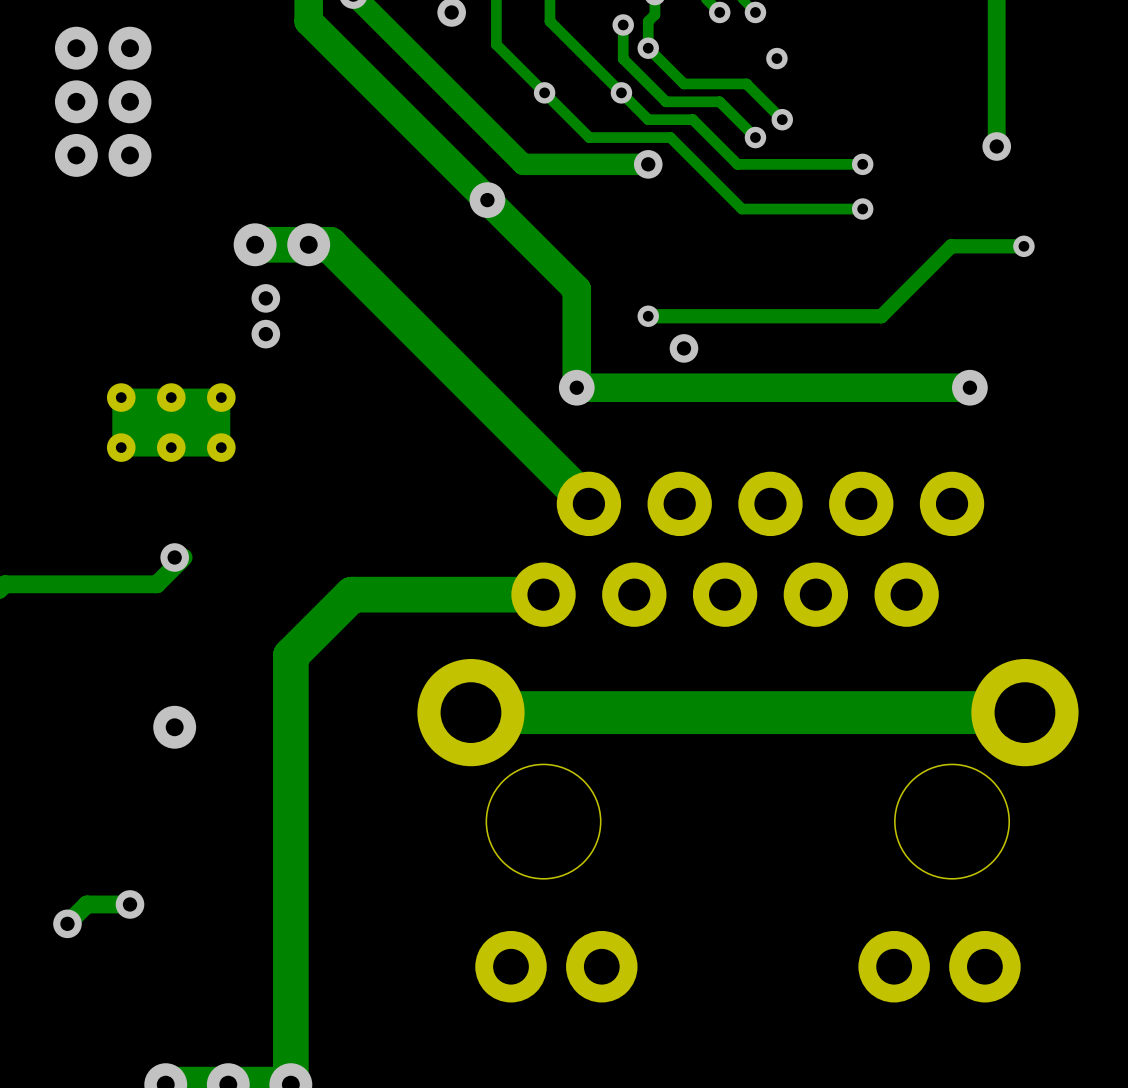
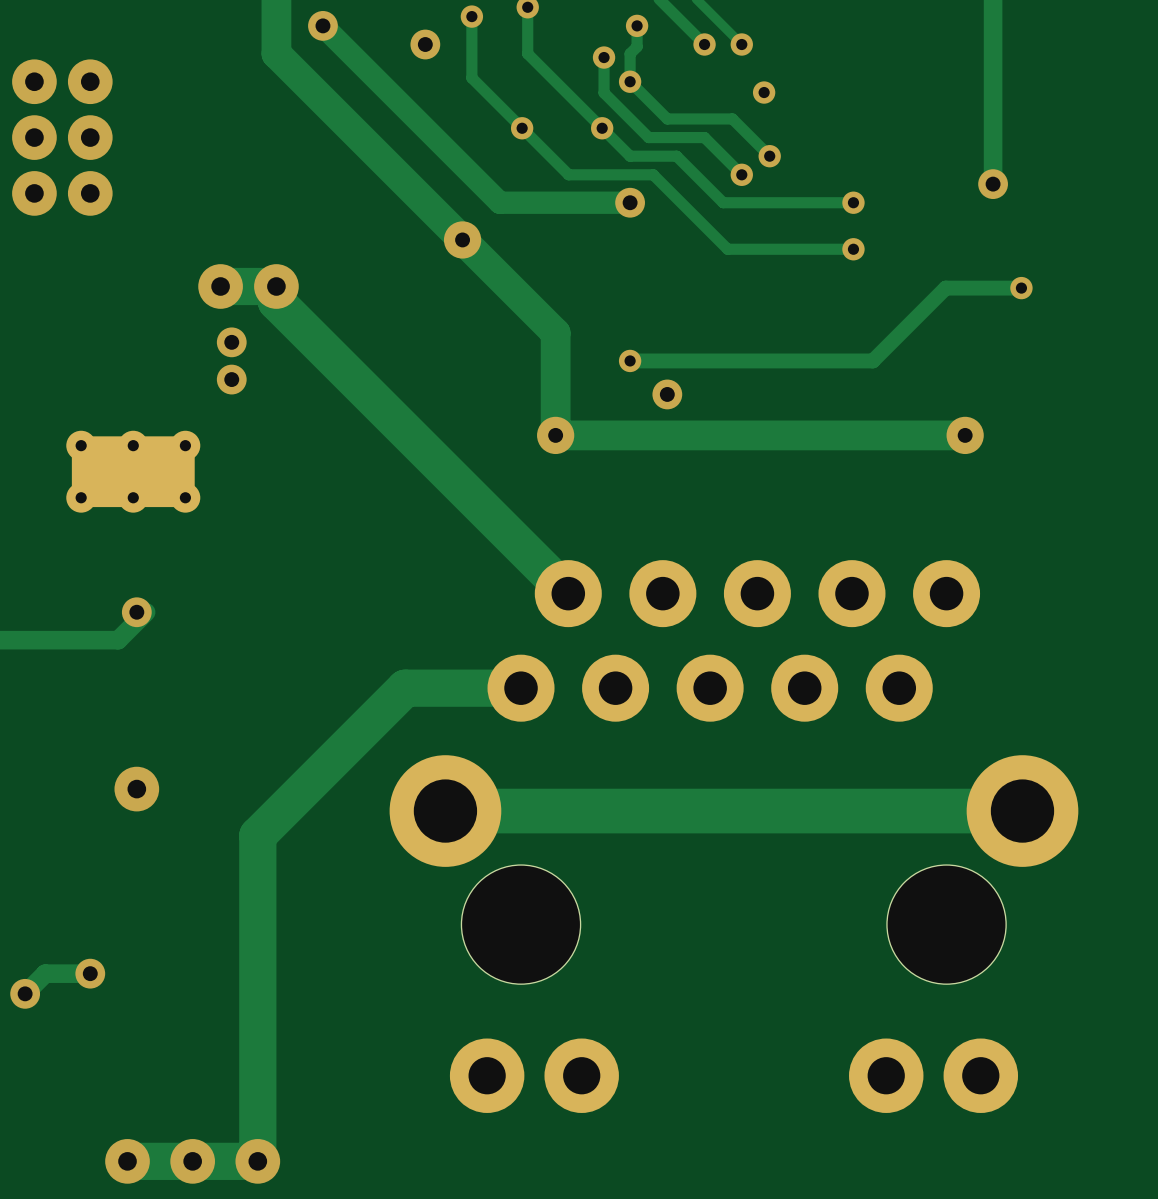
track: (308, 244) (329, 244) (588, 503) -> (276, 286) (276, 301) (568, 593)
track: (543, 594) (351, 594) (290, 655) (290, 771) -> (521, 688) (405, 688) (257, 835)
track: (1024, 712) (470, 712) -> (1022, 811) (445, 811)
part position: (747, 737) -> (733, 836)

